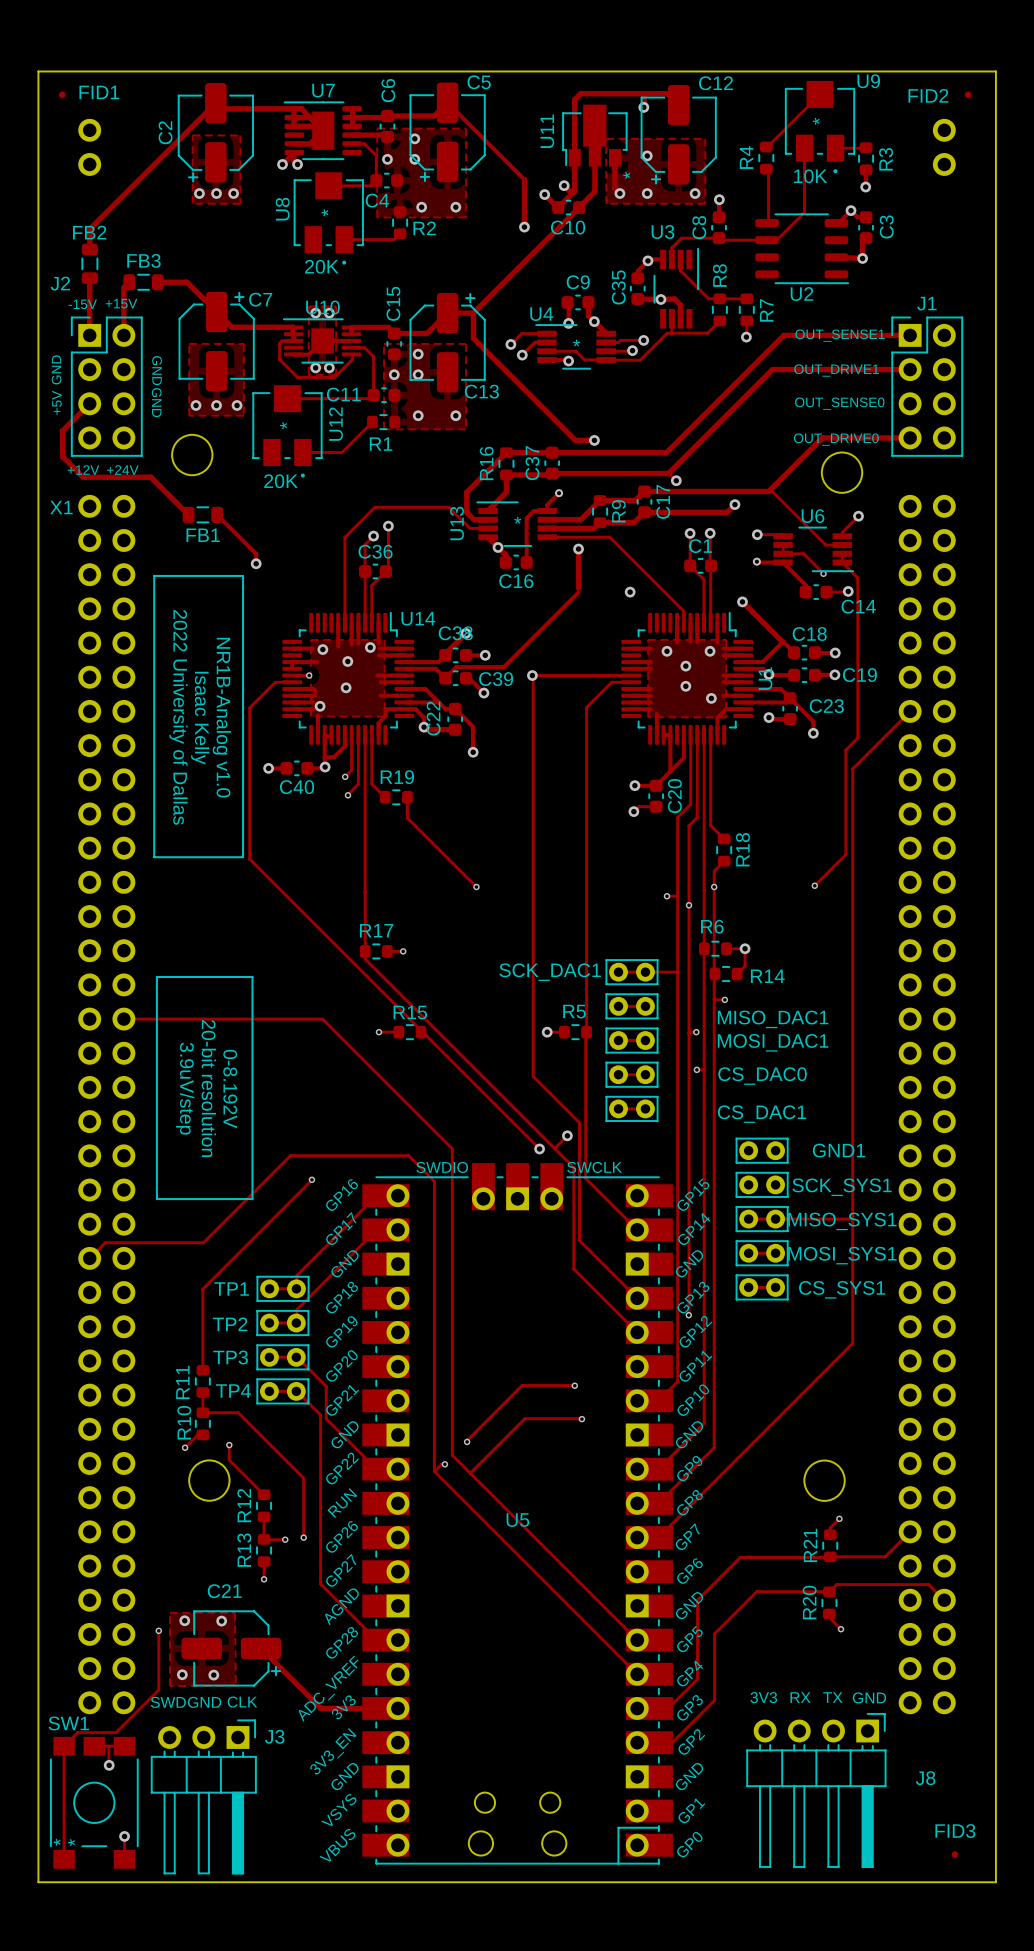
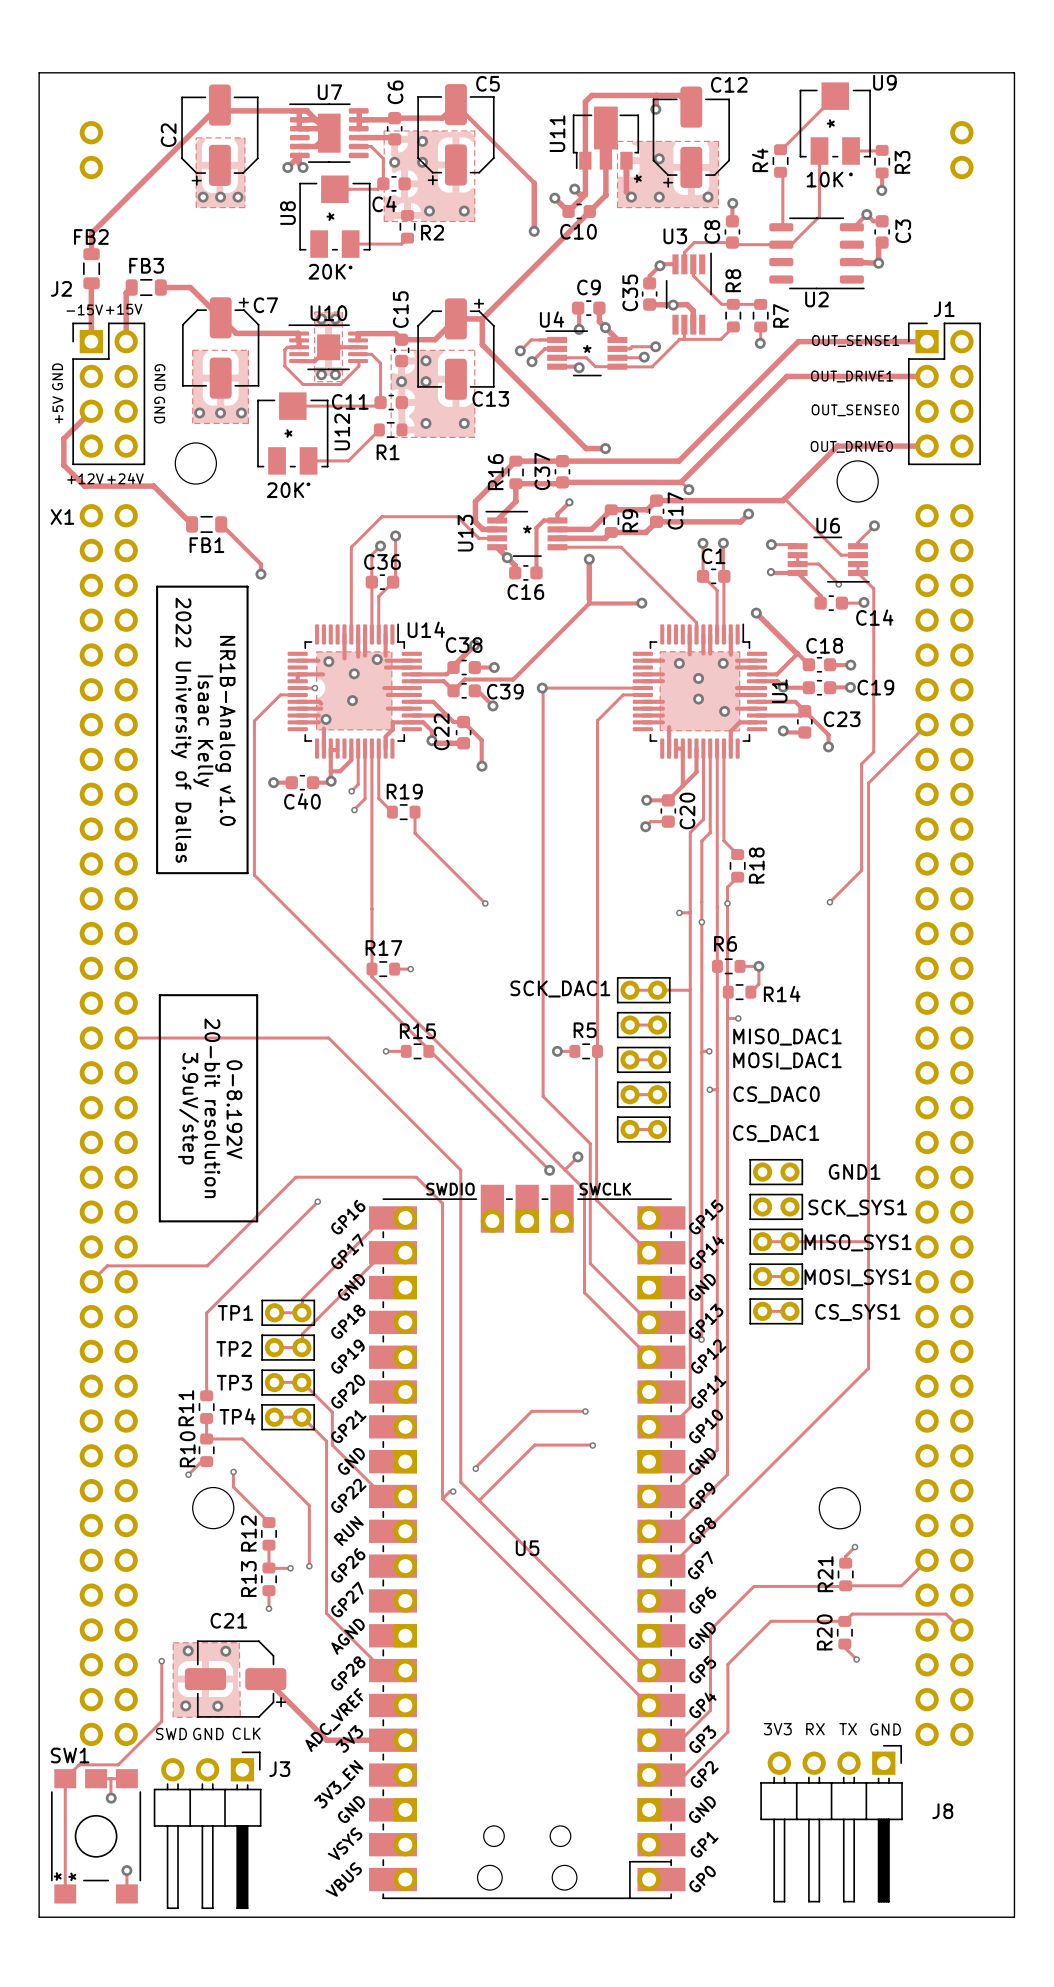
FID1: (62, 94) -> none
FID2: (968, 94) -> none
track: none -> (589, 599) (589, 603) (641, 603)
FID3: (955, 1854) -> none

